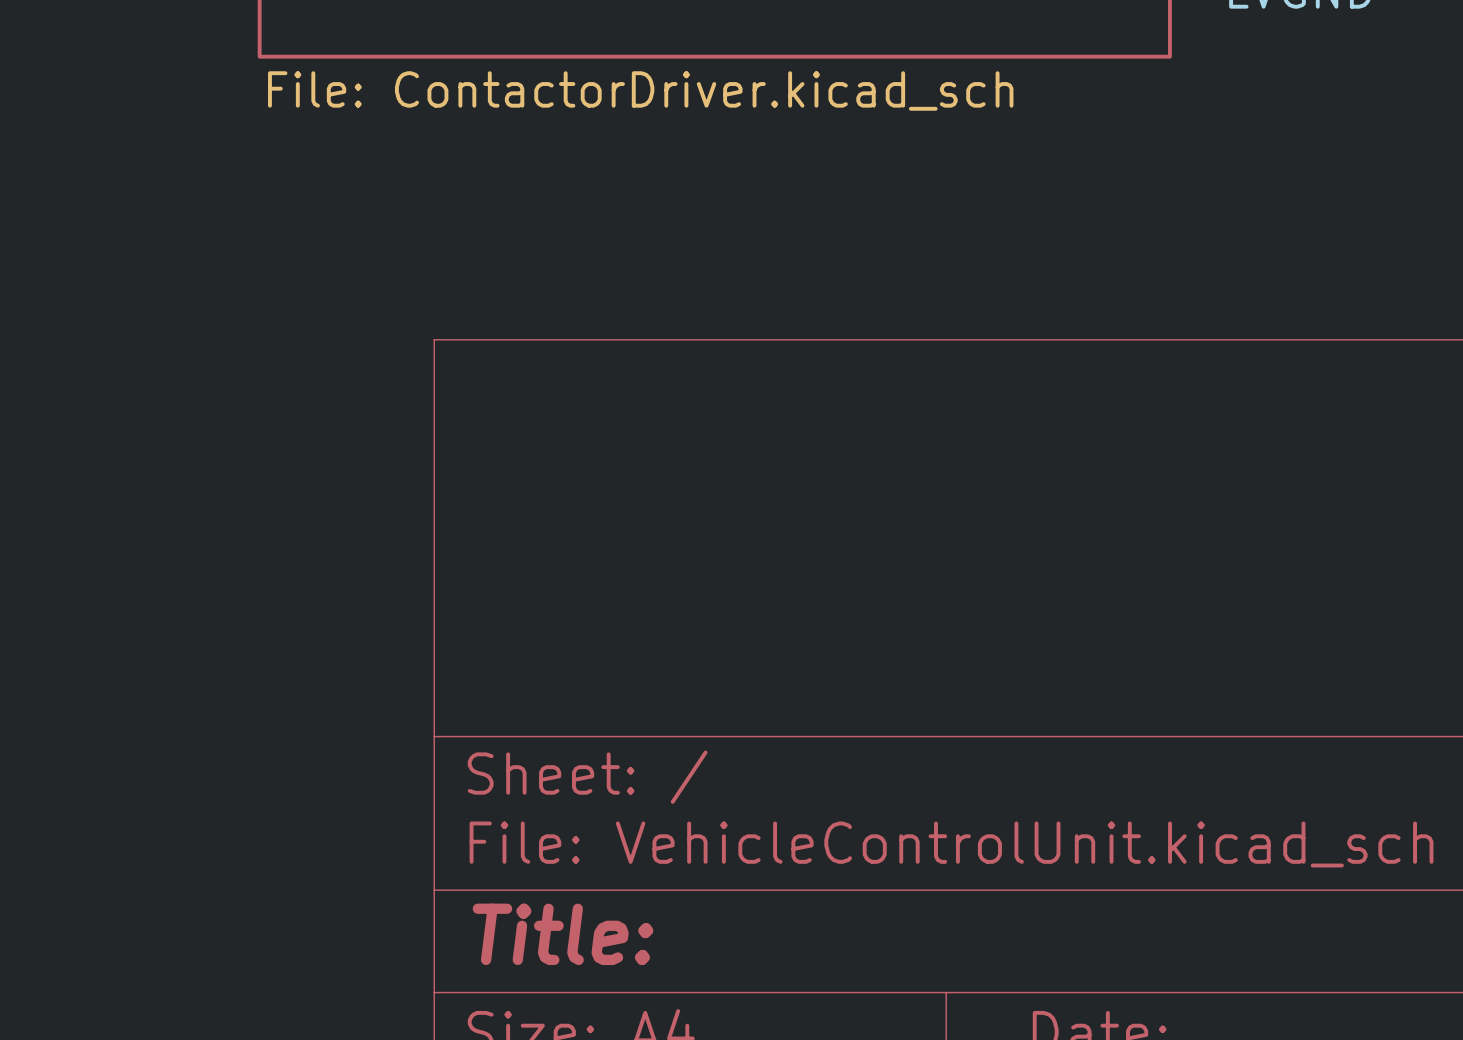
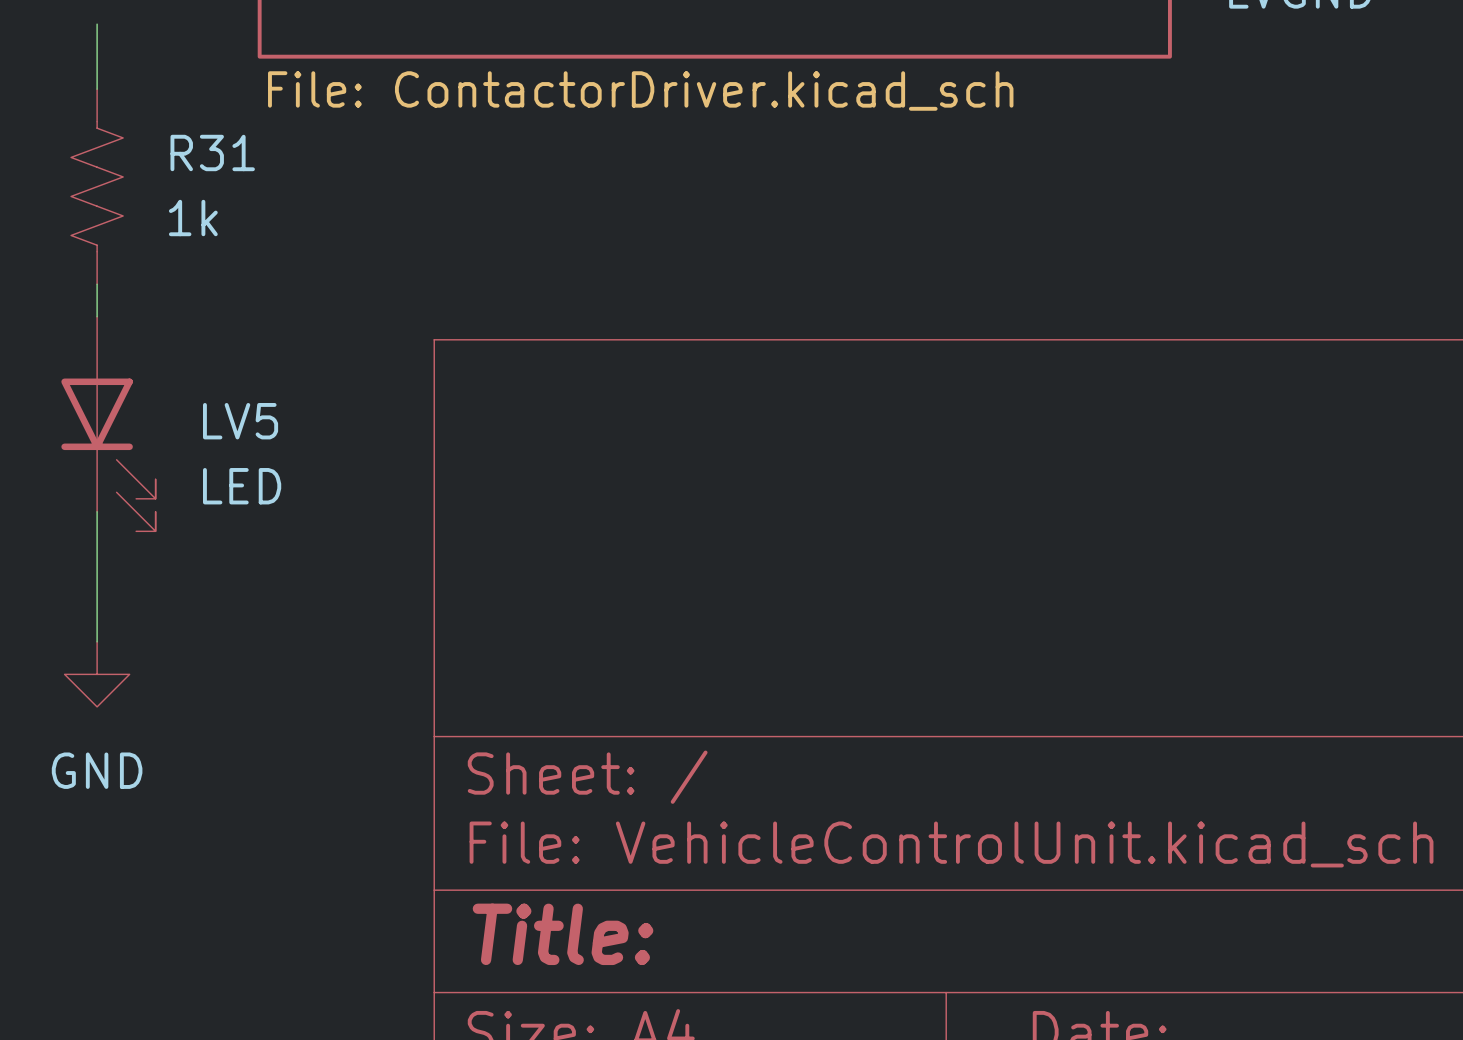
wire: none -> (97, 24) (97, 89)
R31: none -> 1k (97, 186)
wire: none -> (97, 284) (97, 316)
LV5: none -> LED (108, 424)
wire: none -> (97, 511) (97, 641)
power symbol: none -> GND (97, 674)

